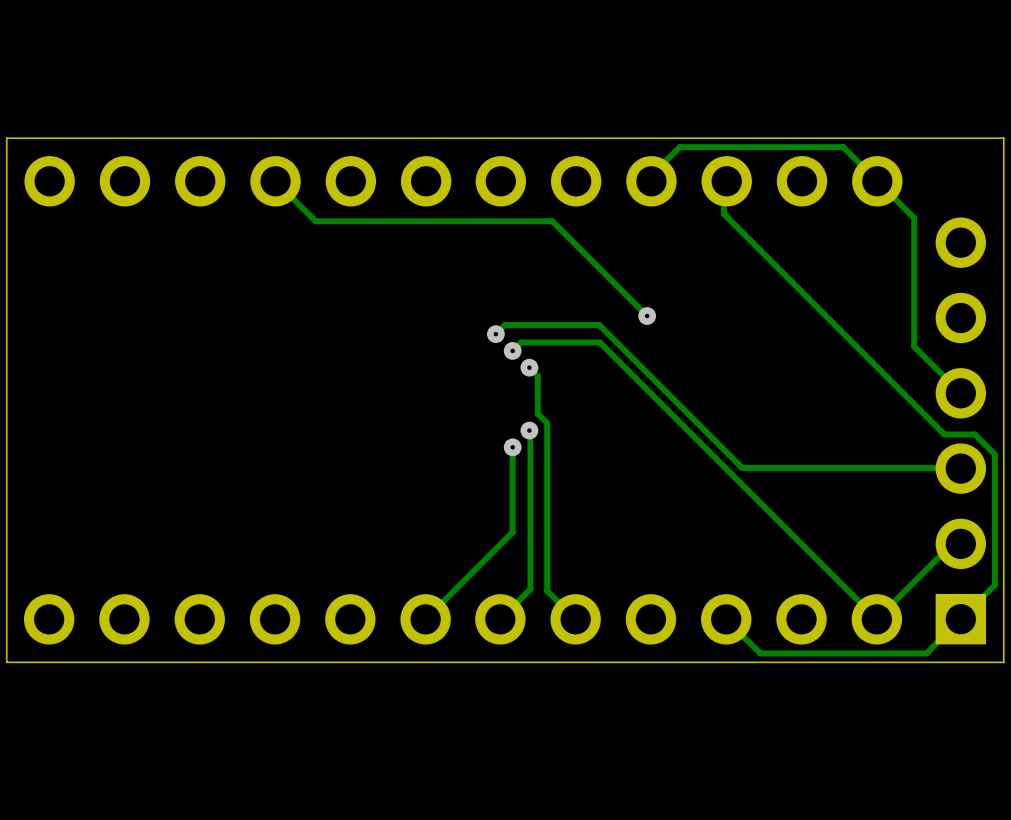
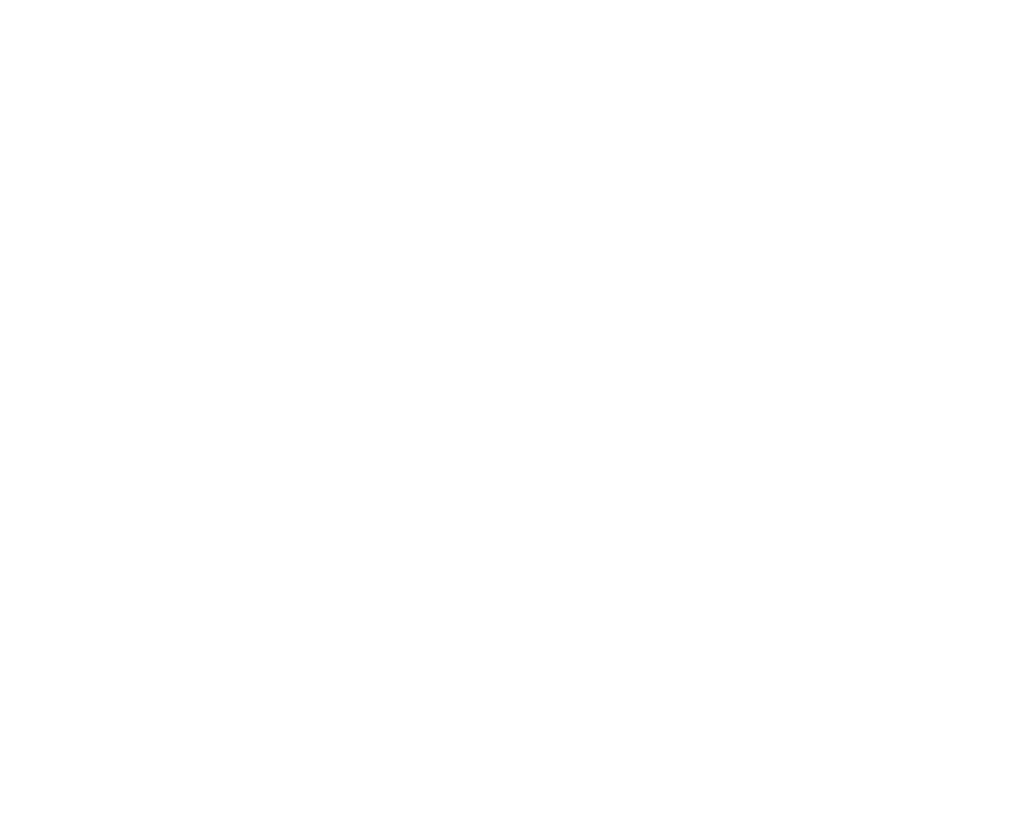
board edge: (1003, 138) (6, 138) (6, 662) (1003, 662) (1003, 138) -> none
track: (272, 178) (315, 221) (552, 221) (647, 316) -> none
track: (648, 178) (679, 147) (843, 147) (914, 218) (914, 346) (960, 393) -> none
track: (723, 178) (723, 213) (944, 434) (974, 434) (994, 454) (994, 585) (926, 653) (760, 653) (726, 619) -> none
part: (463, 181) -> none
via: (647, 316) -> none
track: (495, 334) (505, 325) (599, 325) (742, 467) (960, 468) -> none
via: (495, 334) -> none
track: (512, 350) (521, 342) (600, 342) (876, 619) (952, 543) (960, 543) -> none
via: (512, 350) -> none
track: (529, 367) (537, 376) (537, 413) (547, 423) (547, 590) (575, 619) -> none
via: (529, 367) -> none
via: (529, 430) -> none
part: (960, 430) -> none
track: (530, 439) (530, 589) (500, 619) -> none
track: (512, 447) (512, 532) (425, 619) -> none
via: (512, 447) -> none
part: (463, 619) -> none

